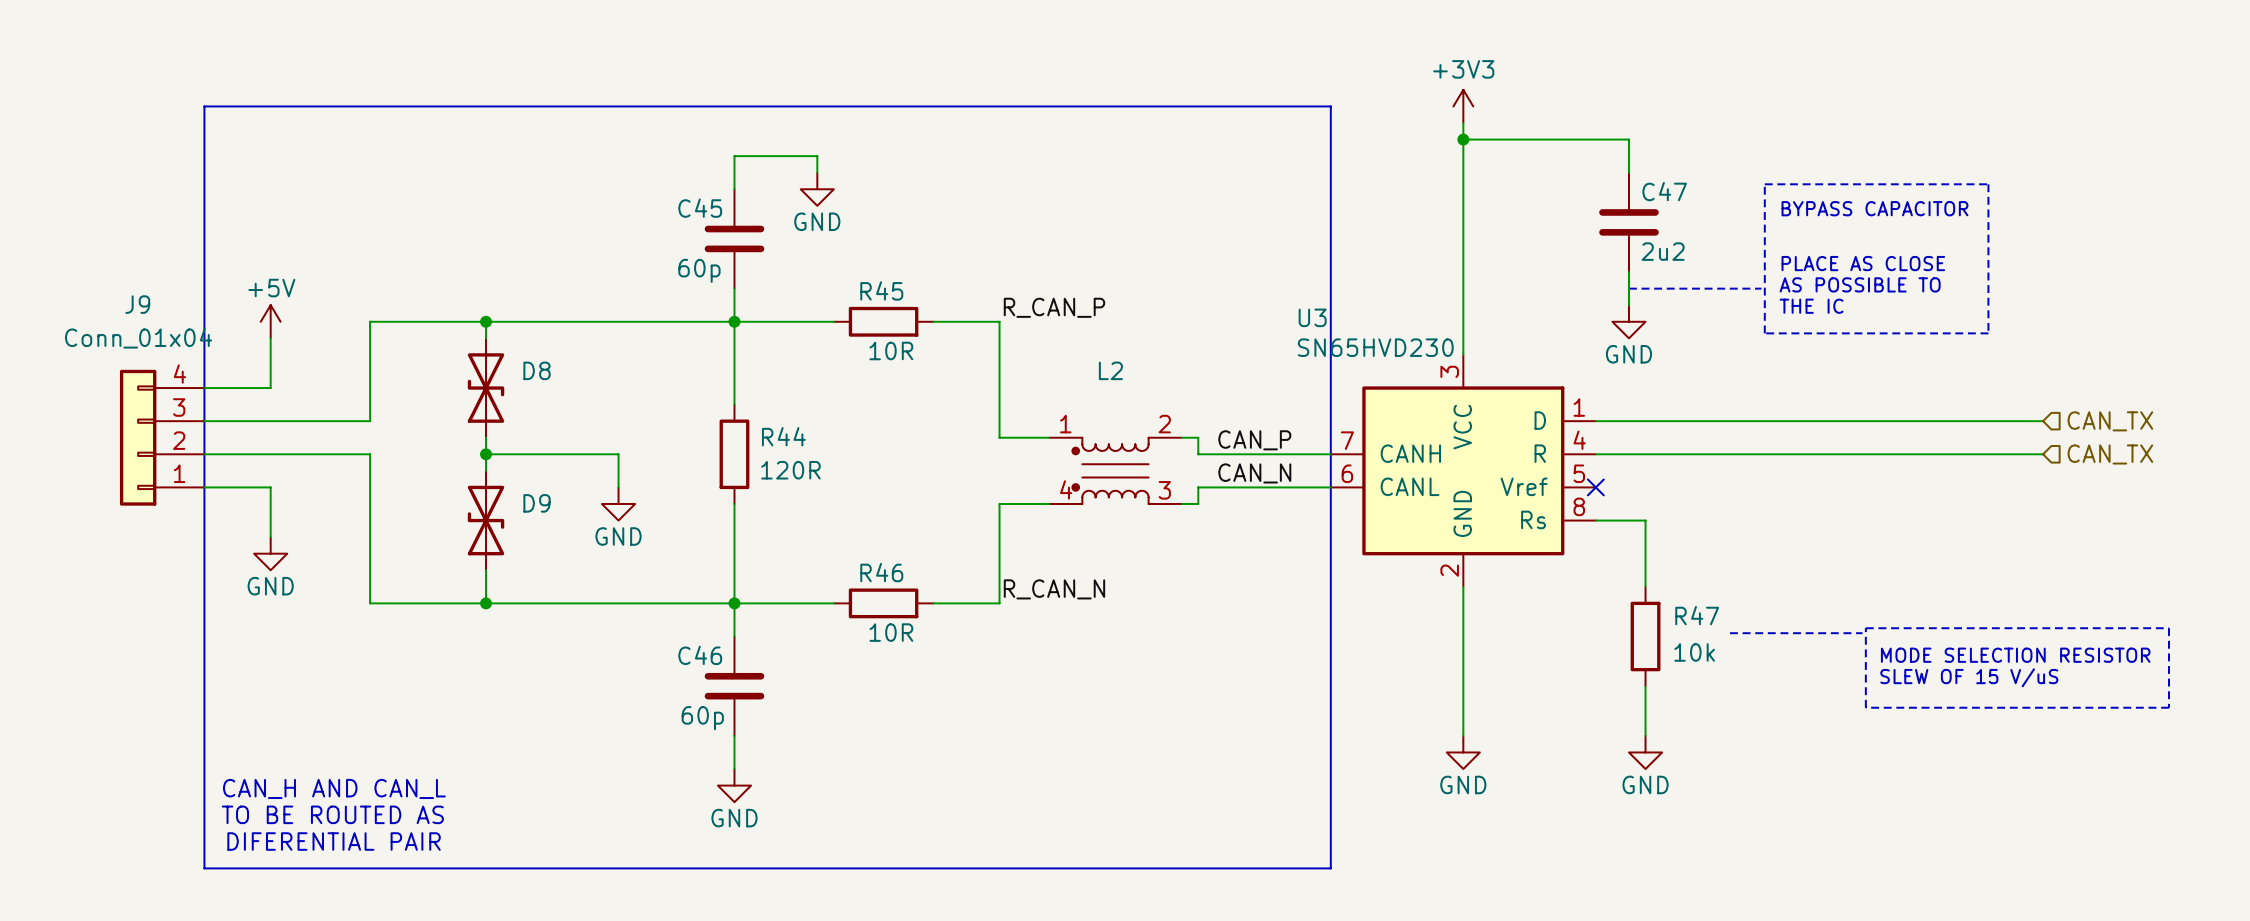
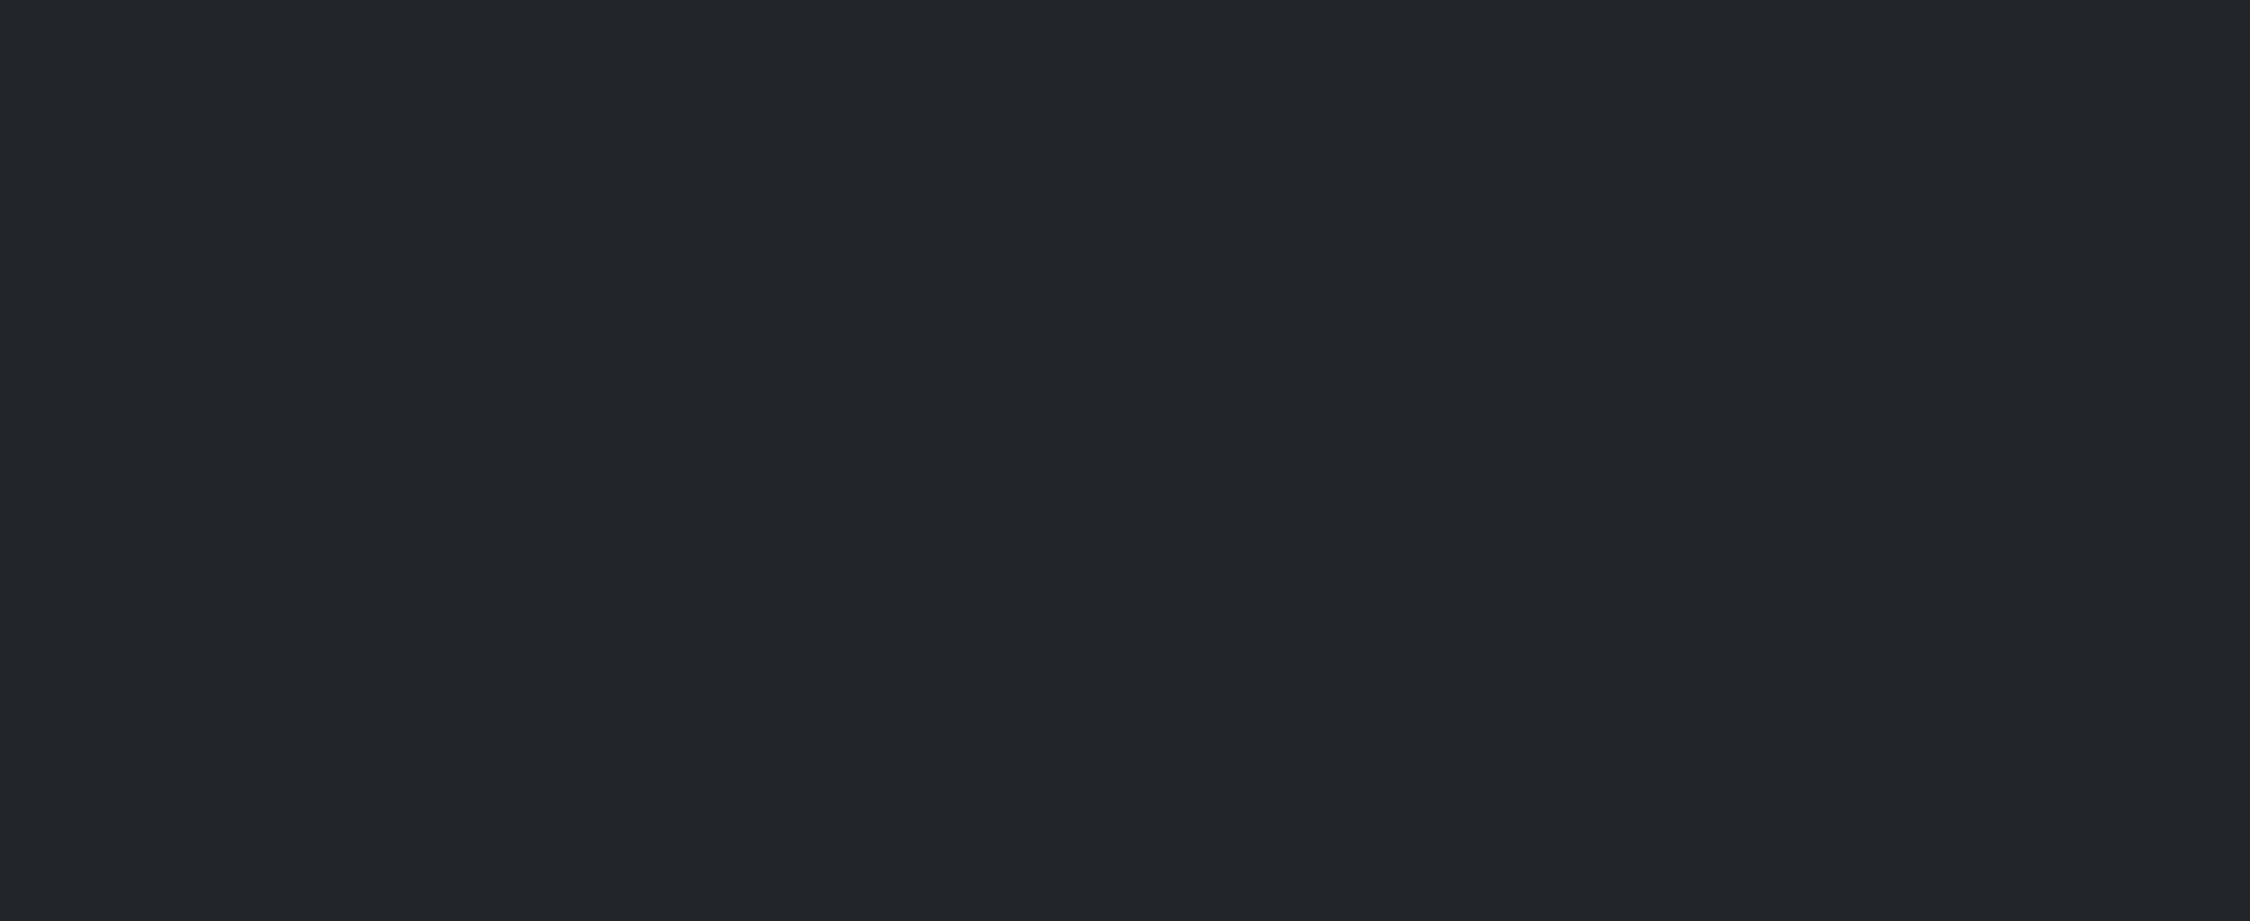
line: (204, 106) (1330, 106) (1330, 868) (204, 868) (204, 106) -> none
power symbol: +3V3 (1463, 106) -> none
wire: (1463, 123) (1463, 354) -> none
wire: (1463, 139) (1628, 139) (1628, 172) -> none
junction: (1463, 139) -> none
wire: (817, 172) (817, 156) (734, 156) (734, 189) -> none
line: (1764, 184) (1988, 184) (1988, 333) (1764, 333) (1764, 184) -> none
power symbol: GND (817, 189) -> none
text: BYPASS CAPACITOR (1874, 208) -> none
C47: 2u2 (1628, 222) -> none
C45: 60p (734, 238) -> none
text: PLACE AS CLOSE (1863, 263) -> none
wire: (1628, 272) (1628, 305) -> none
text: AS POSSIBLE TO (1860, 284) -> none
wire: (734, 288) (734, 404) -> none
line: (1628, 288) (1761, 288) -> none
text: THE IC (1811, 306) -> none
label: R_CAN_P (1054, 307) -> none
power symbol: +5V (270, 321) -> none
wire: (486, 321) (486, 338) -> none
junction: (486, 321) -> none
junction: (734, 321) -> none
wire: (833, 321) (370, 321) (370, 421) (204, 421) -> none
R45: 10R (883, 321) -> none
wire: (933, 321) (999, 321) (999, 437) (1049, 437) -> none
power symbol: GND (1628, 321) -> none
wire: (270, 338) (270, 388) (204, 388) -> none
D8: (486, 388) -> none
wire: (1595, 421) (2043, 421) -> none
hierarchical label: CAN_TX (2110, 421) -> none
J9: Conn_01x04 (162, 437) -> none
wire: (486, 437) (486, 470) -> none
wire: (1181, 437) (1198, 437) (1198, 454) (1330, 454) -> none
label: CAN_P (1254, 440) -> none
wire: (204, 454) (370, 454) (370, 603) (833, 603) -> none
wire: (486, 454) (618, 454) (618, 487) -> none
junction: (486, 454) -> none
R44: 120R (734, 454) -> none
wire: (1595, 454) (2043, 454) -> none
hierarchical label: CAN_TX (2110, 454) -> none
L2: (1115, 470) -> none
U3: SN65HVD230 (1463, 470) -> none
label: CAN_N (1254, 473) -> none
wire: (204, 487) (270, 487) (270, 537) -> none
wire: (1330, 487) (1198, 487) (1198, 503) (1181, 503) -> none
no-connect mark: (1595, 487) -> none
power symbol: GND (618, 503) -> none
wire: (734, 503) (734, 636) -> none
wire: (1049, 503) (999, 503) (999, 603) (933, 603) -> none
D9: (486, 520) -> none
wire: (1595, 520) (1645, 520) (1645, 586) -> none
power symbol: GND (270, 553) -> none
wire: (486, 570) (486, 603) -> none
wire: (1463, 586) (1463, 735) -> none
label: R_CAN_N (1054, 589) -> none
junction: (486, 603) -> none
junction: (734, 603) -> none
R46: 10R (883, 603) -> none
line: (1865, 628) (2168, 628) (2168, 707) (1865, 707) (1865, 628) -> none
line: (1730, 633) (1862, 633) -> none
R47: 10k (1645, 636) -> none
text: MODE SELECTION RESISTOR (2015, 655) -> none
text: SLEW OF 15 V/uS (1969, 677) -> none
C46: 60p (734, 686) -> none
wire: (1645, 686) (1645, 735) -> none
wire: (734, 735) (734, 769) -> none
power symbol: GND (1463, 752) -> none
power symbol: GND (1645, 752) -> none
power symbol: GND (734, 785) -> none
text: CAN_H AND CAN_L (334, 788) -> none
text: TO BE ROUTED AS (332, 814) -> none
text: DIFERENTIAL PAIR (334, 841) -> none

